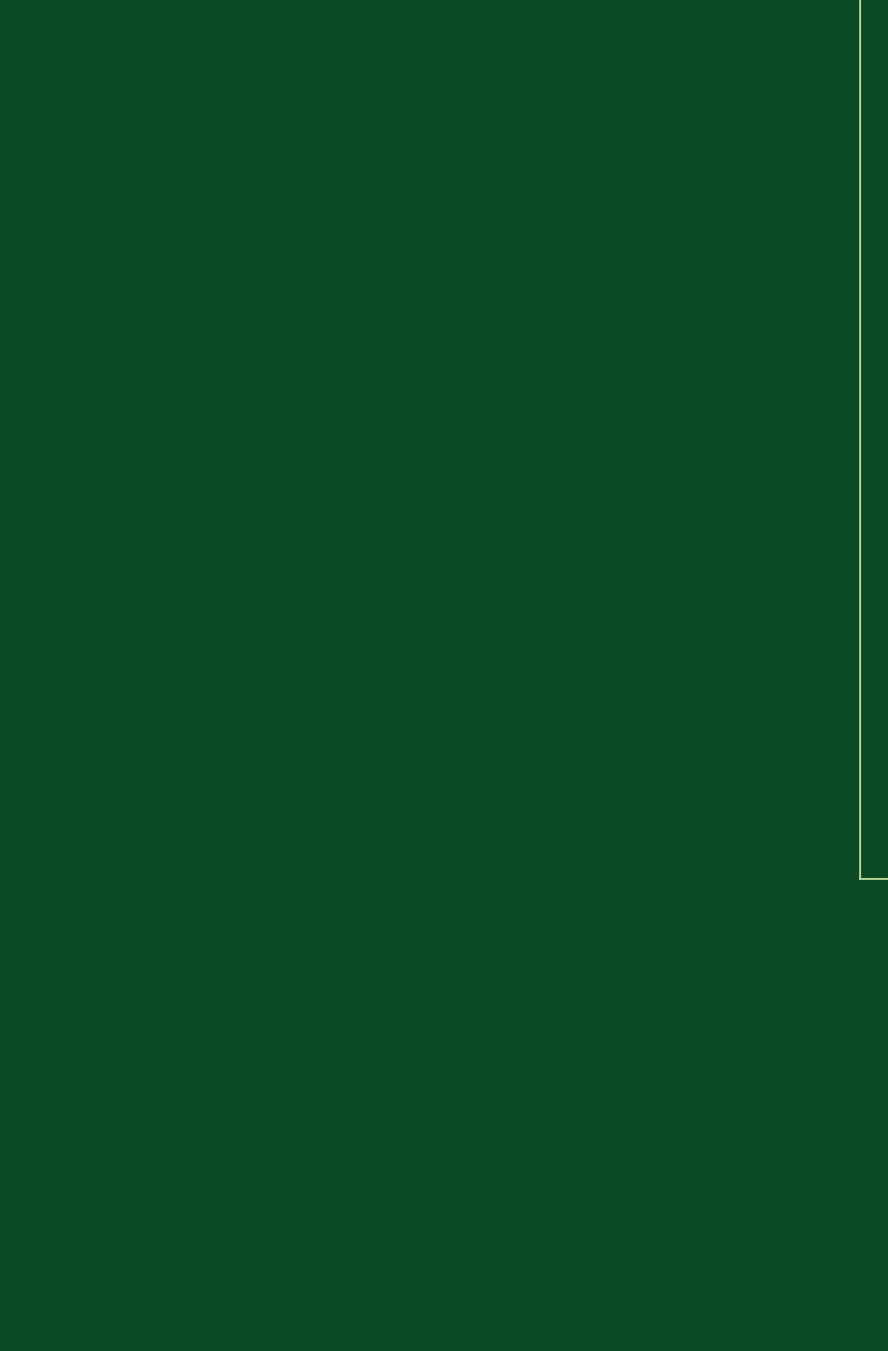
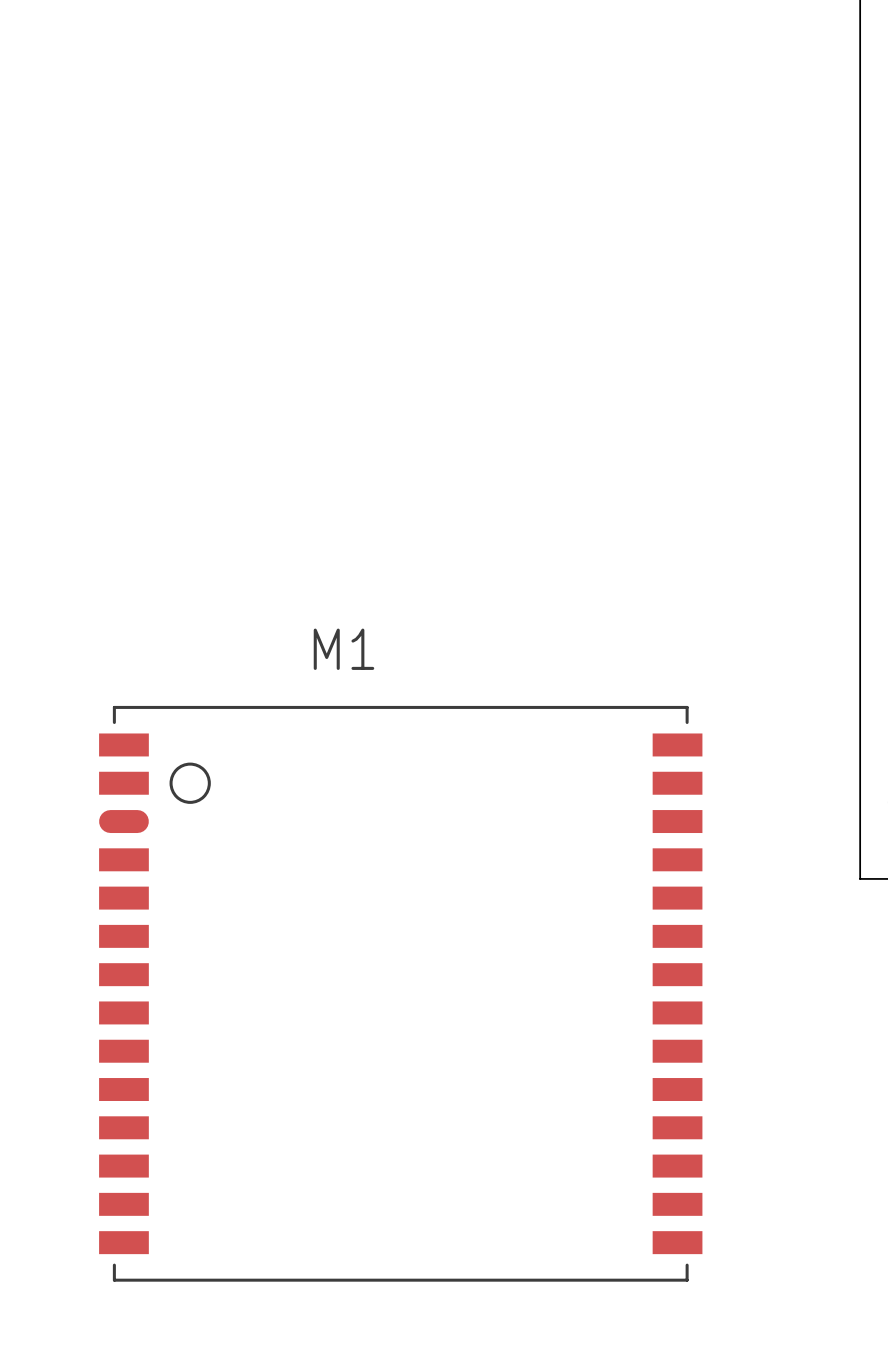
M1: none -> (400, 993)

